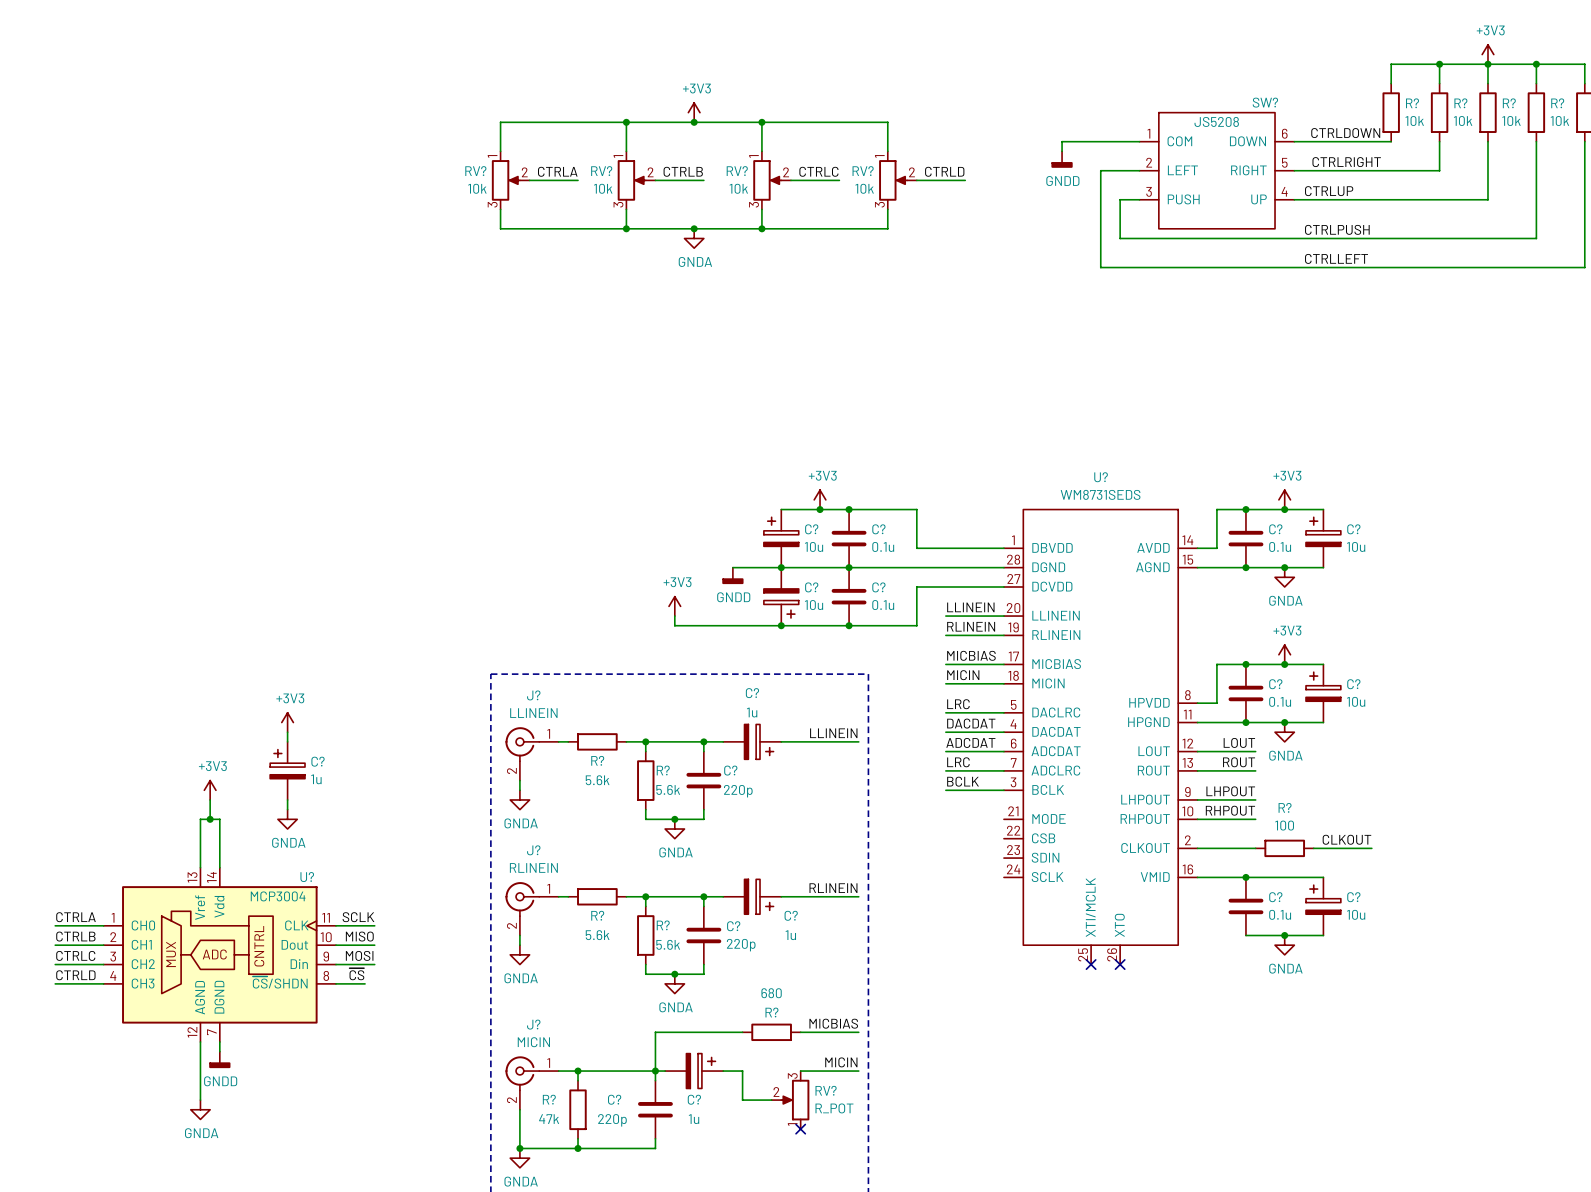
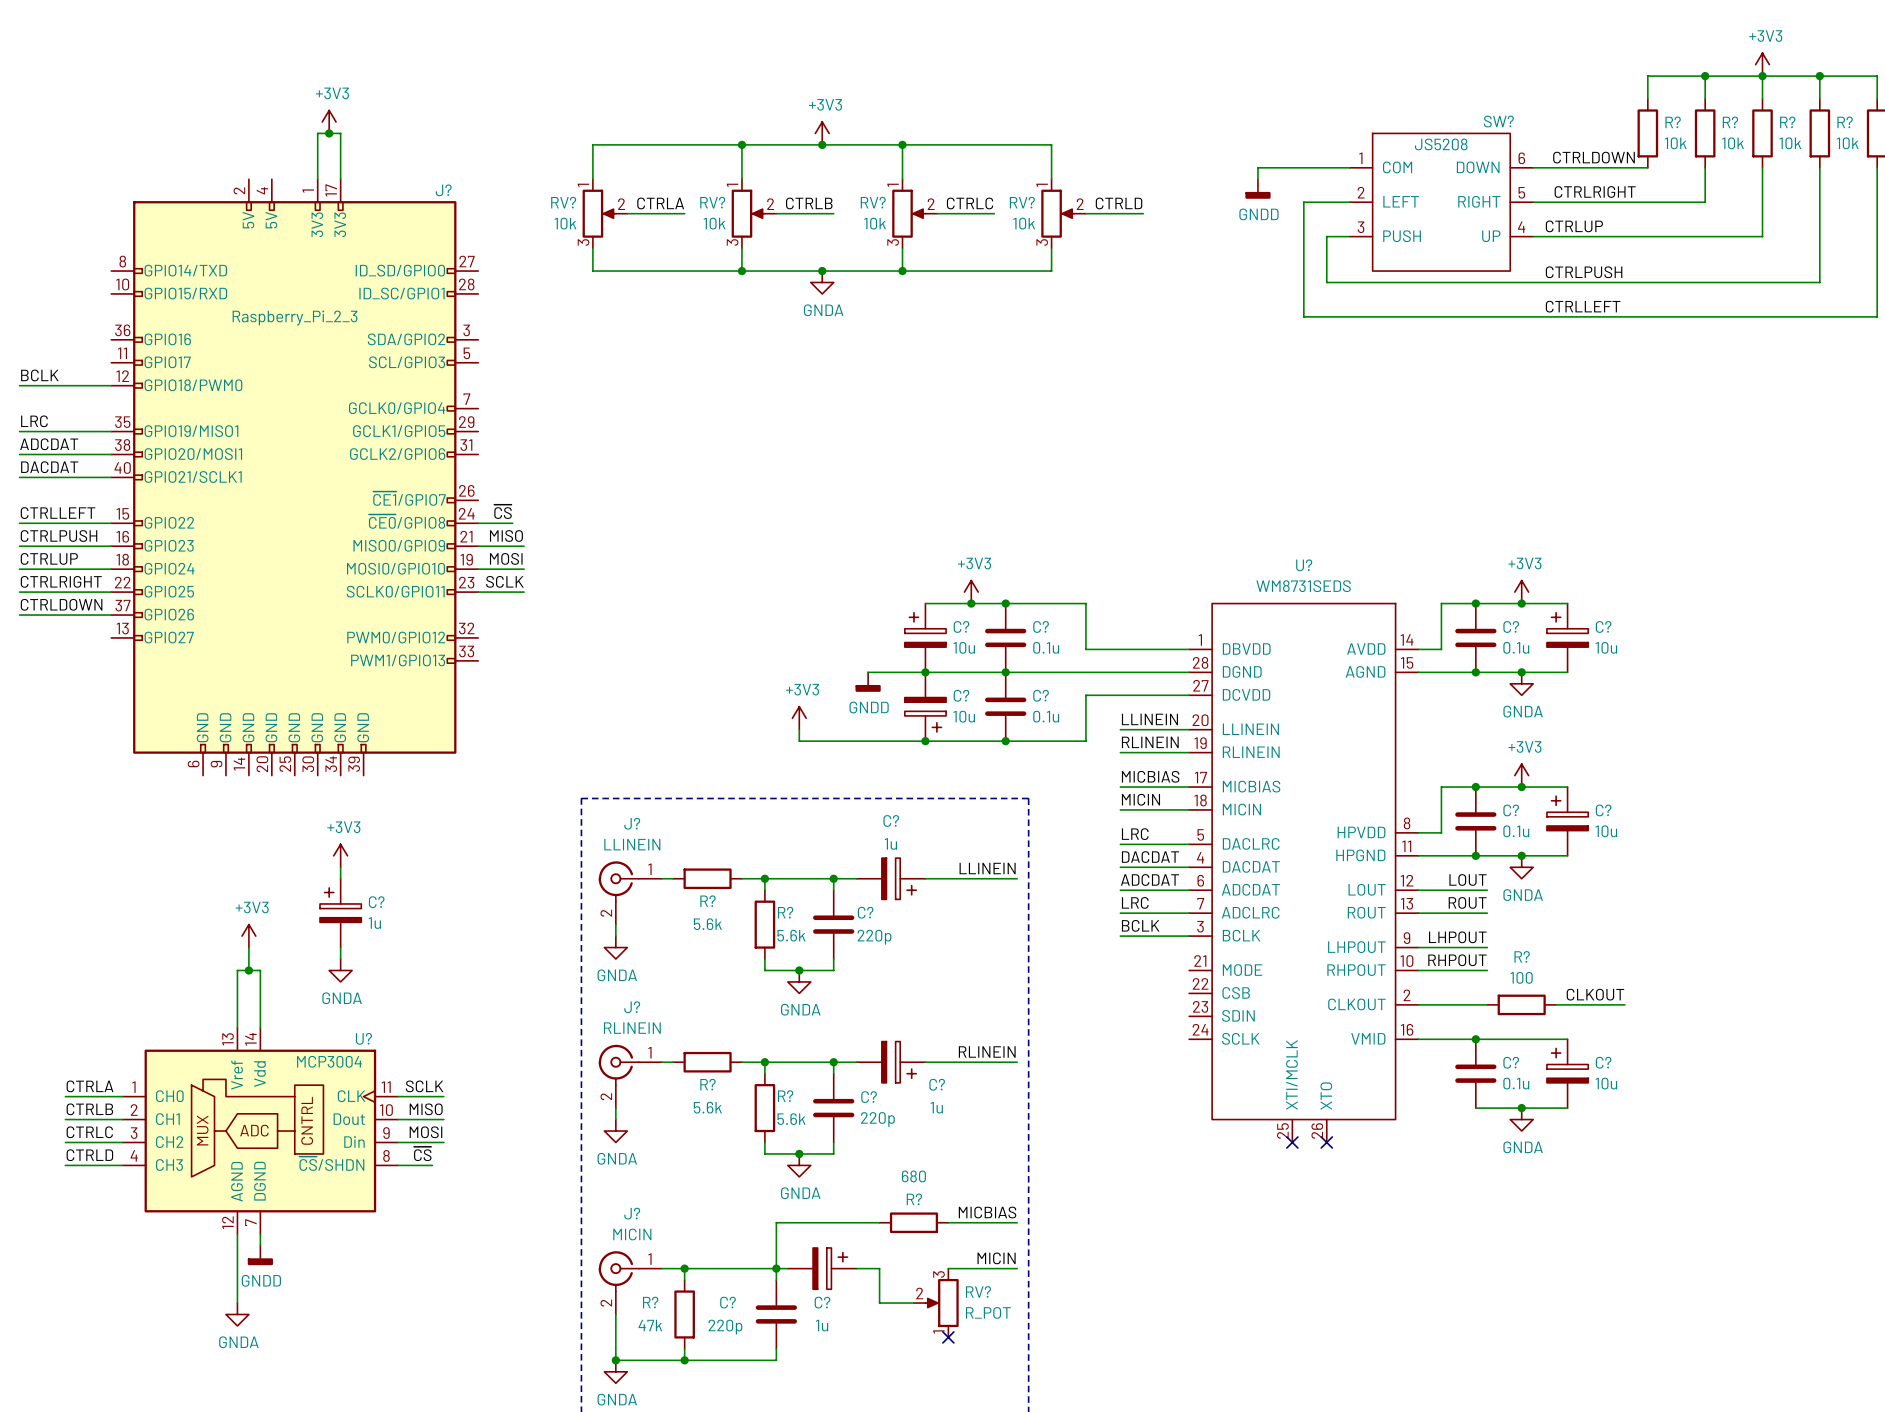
power symbol: none -> +3V3 (329, 121)
junction: none -> (329, 133)
wire: none -> (317, 179) (317, 133) (340, 133) (340, 179)
label: none -> BCLK (39, 375)
wire: none -> (19, 385) (111, 385)
label: none -> LRC (34, 421)
wire: none -> (19, 431) (111, 431)
label: none -> ADCDAT (49, 444)
wire: none -> (19, 454) (111, 454)
label: none -> DACDAT (49, 467)
wire: none -> (19, 477) (111, 477)
J?: none -> Raspberry_Pi_2_3 (294, 477)
label: none -> ~{CS} (503, 511)
label: none -> CTRLLEFT (58, 513)
wire: none -> (19, 523) (111, 523)
wire: none -> (478, 523) (512, 523)
label: none -> CTRLPUSH (59, 536)
label: none -> MISO (506, 535)
wire: none -> (19, 546) (111, 546)
wire: none -> (478, 546) (524, 546)
label: none -> CTRLUP (49, 558)
label: none -> MOSI (506, 558)
wire: none -> (19, 569) (111, 569)
wire: none -> (478, 569) (524, 569)
label: none -> CTRLRIGHT (61, 581)
label: none -> SCLK (504, 581)
wire: none -> (19, 592) (111, 592)
wire: none -> (478, 592) (524, 592)
label: none -> CTRLDOWN (61, 604)
wire: none -> (19, 615) (111, 615)

